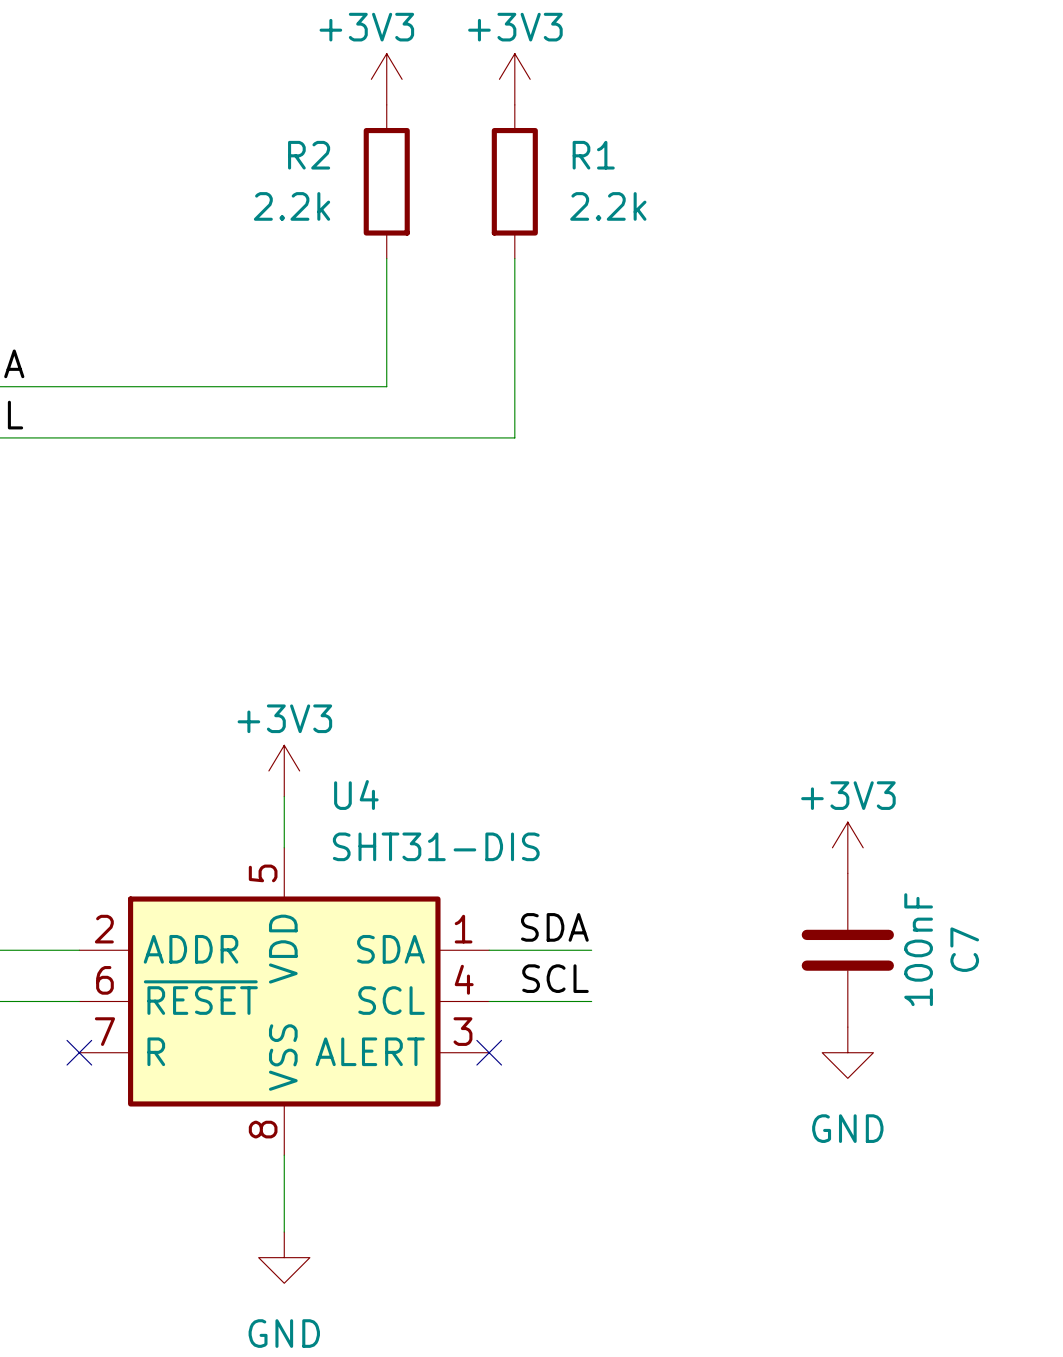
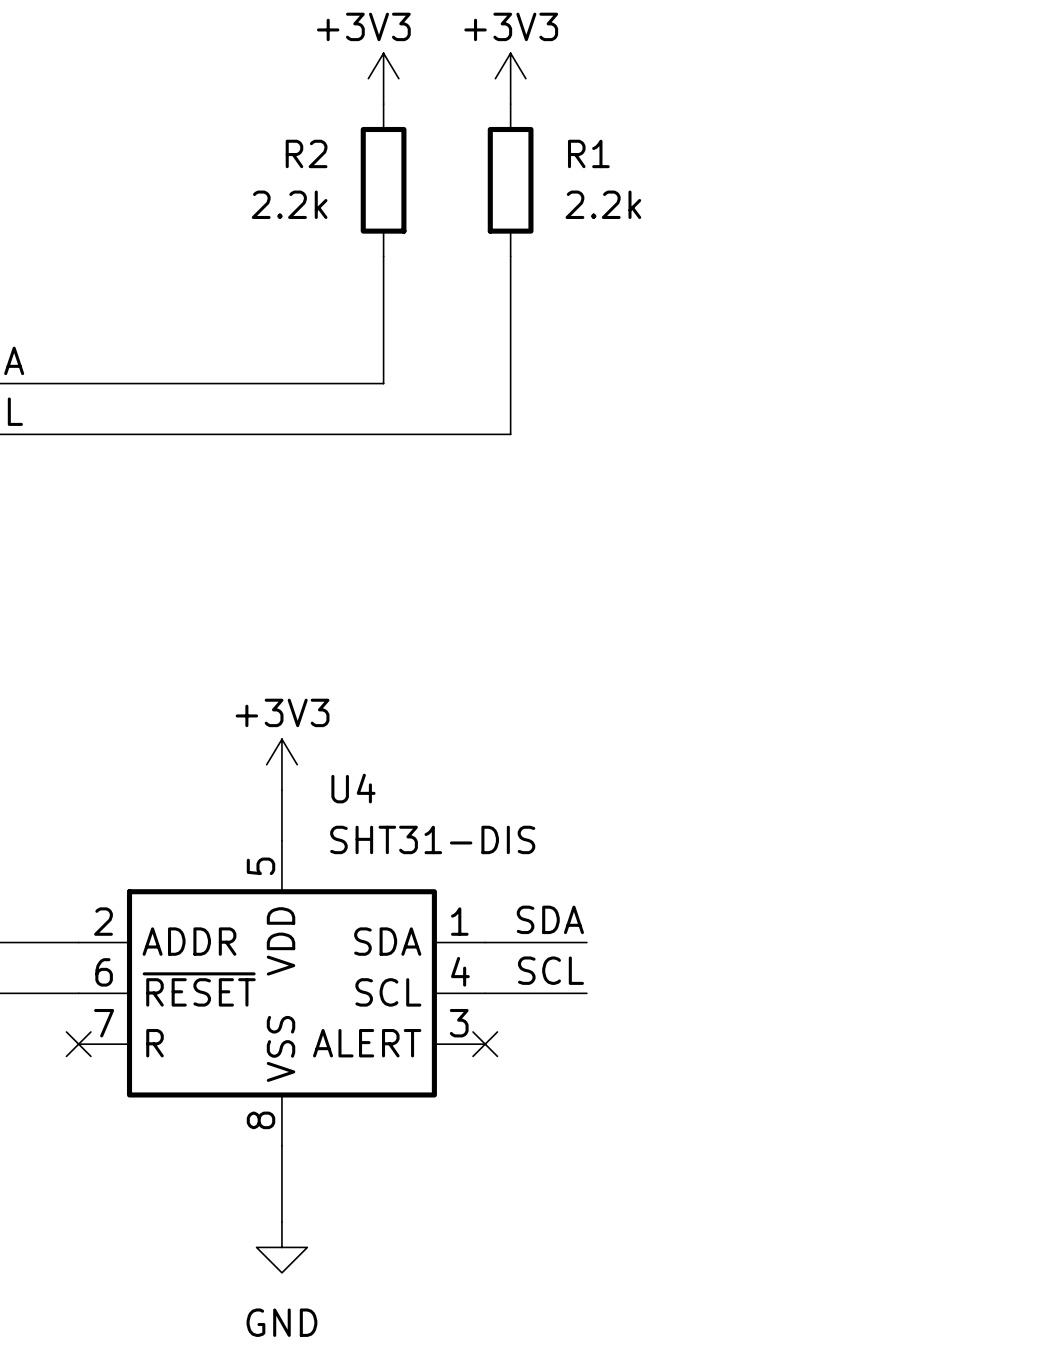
power symbol: +3V3 (847, 847) -> none
C7: 100nF (847, 950) -> none
power symbol: GND (847, 1052) -> none

